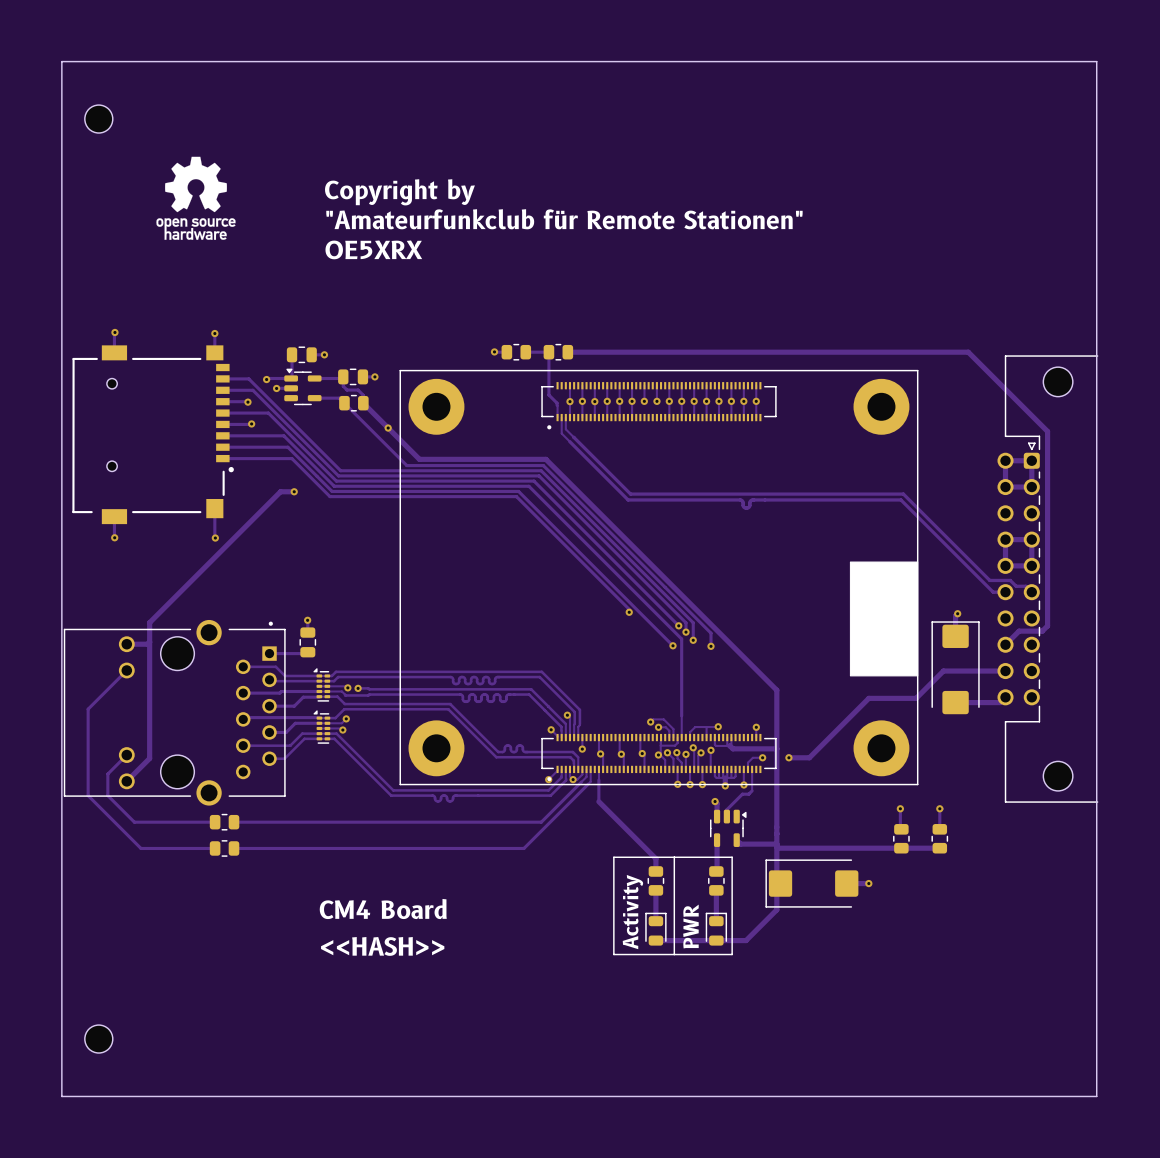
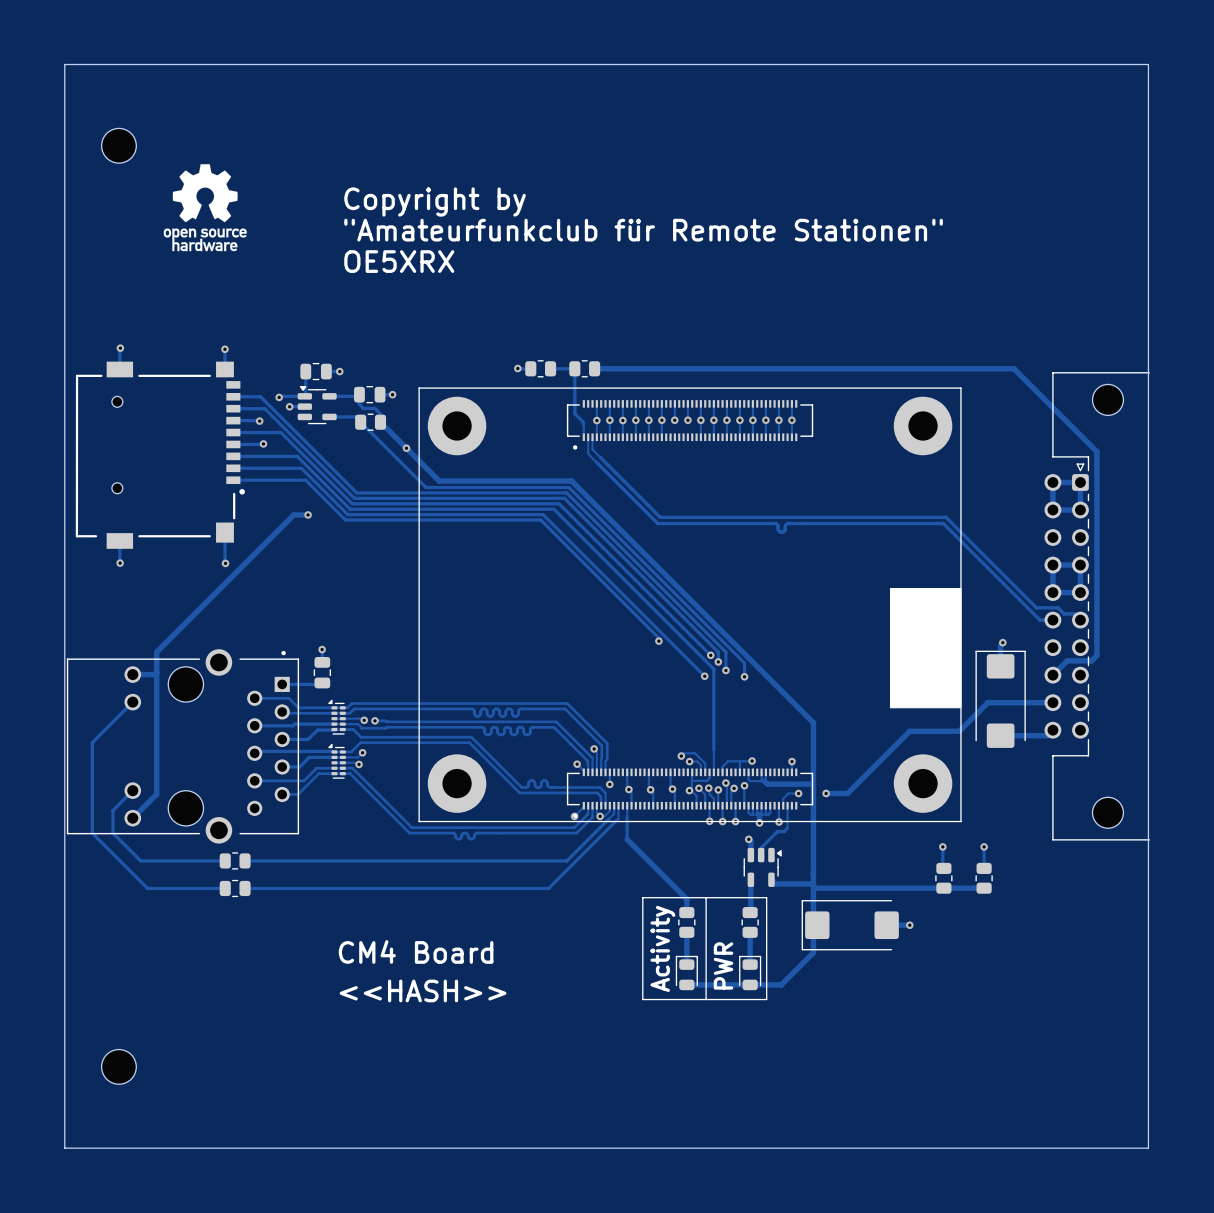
part: (98, 119) -> none
part: none -> (118, 145)
part: none -> (118, 1066)
part: (98, 1039) -> none

